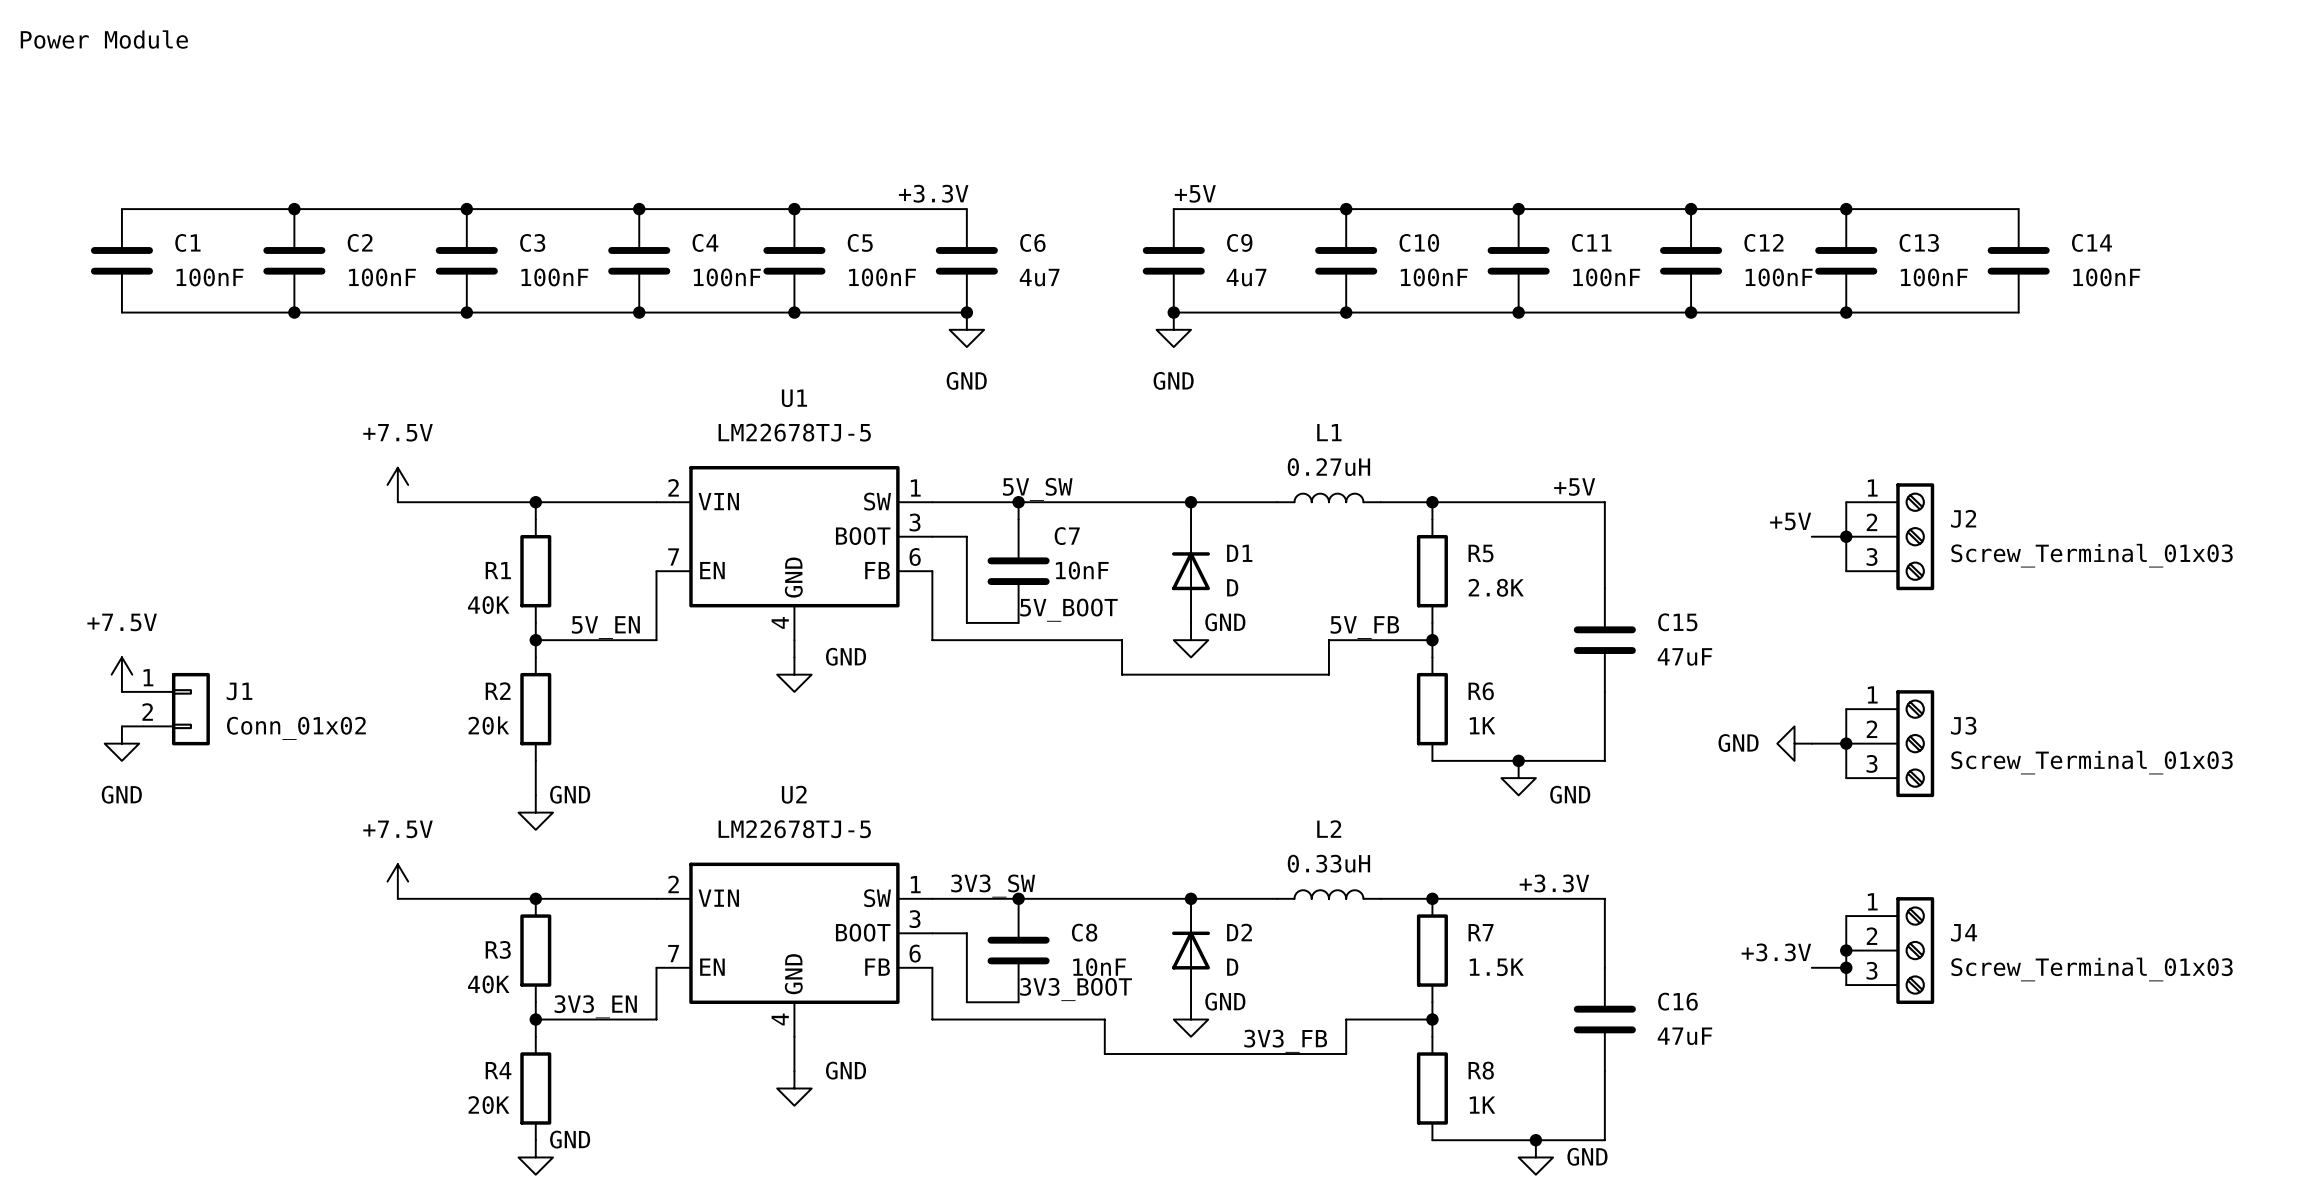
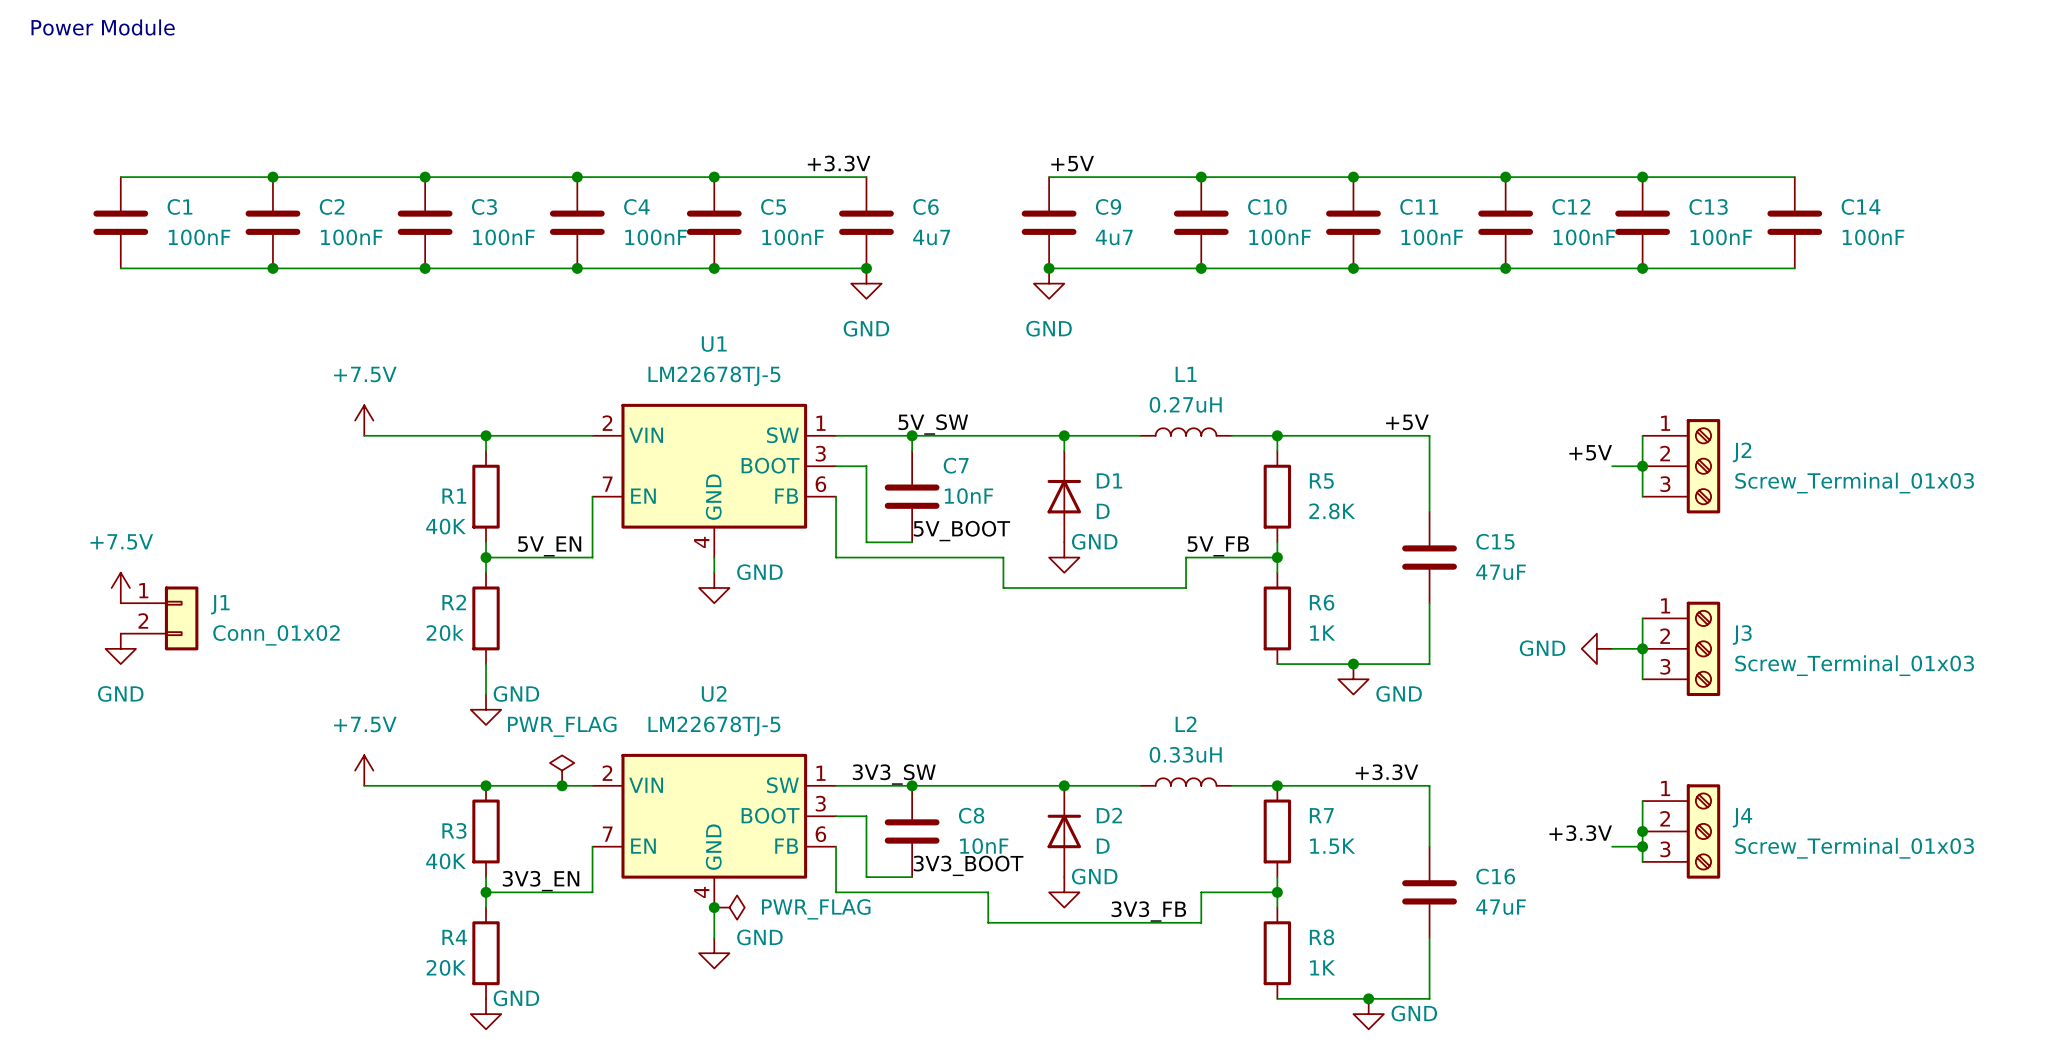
power symbol: none -> PWR_FLAG (562, 770)
junction: none -> (562, 785)
junction: none -> (714, 907)
power symbol: none -> PWR_FLAG (729, 907)

